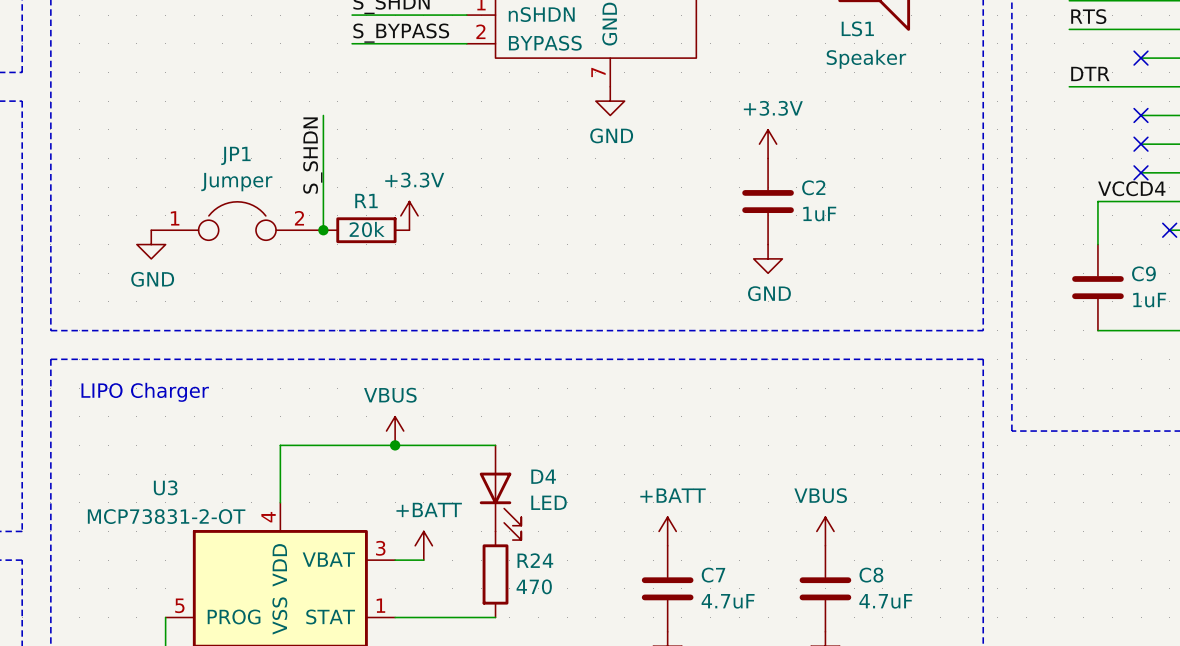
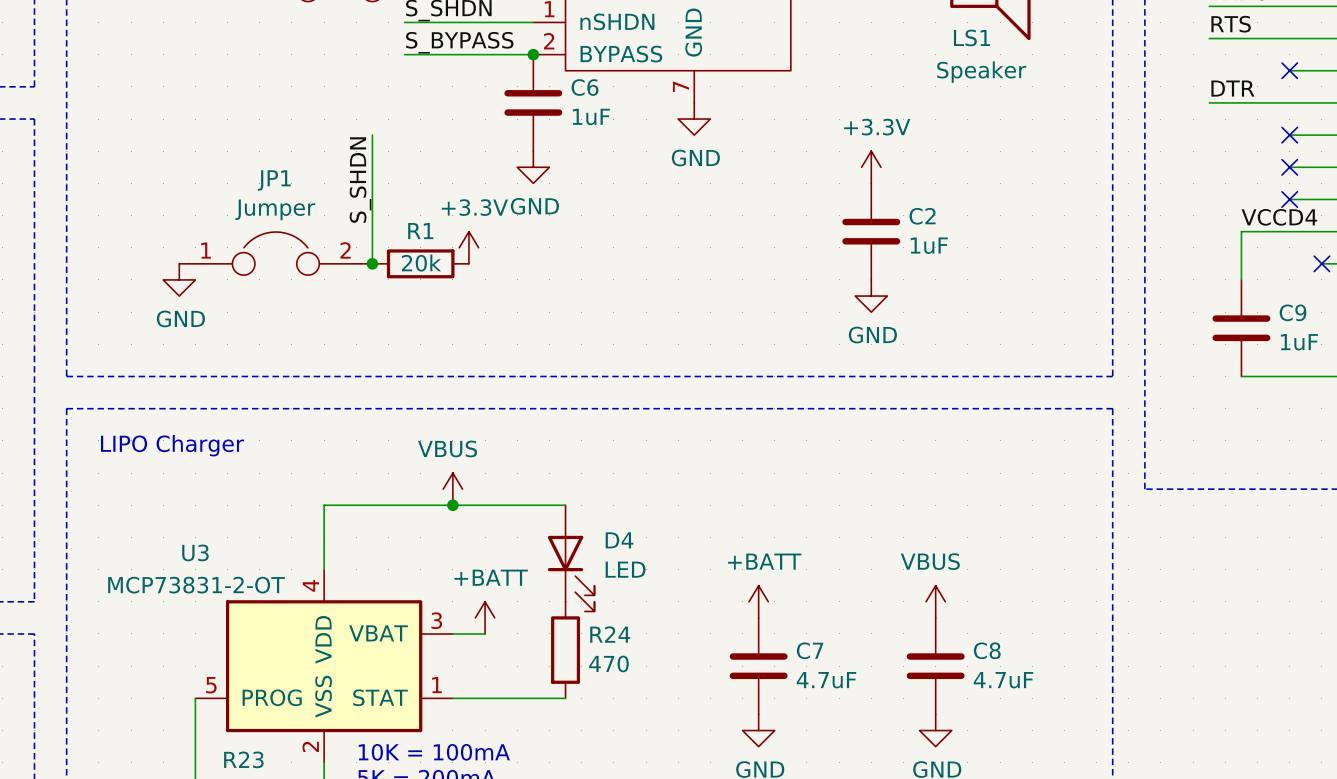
junction: none -> (533, 54)
C6: none -> 1uF (533, 102)
power symbol: none -> GND (533, 167)

